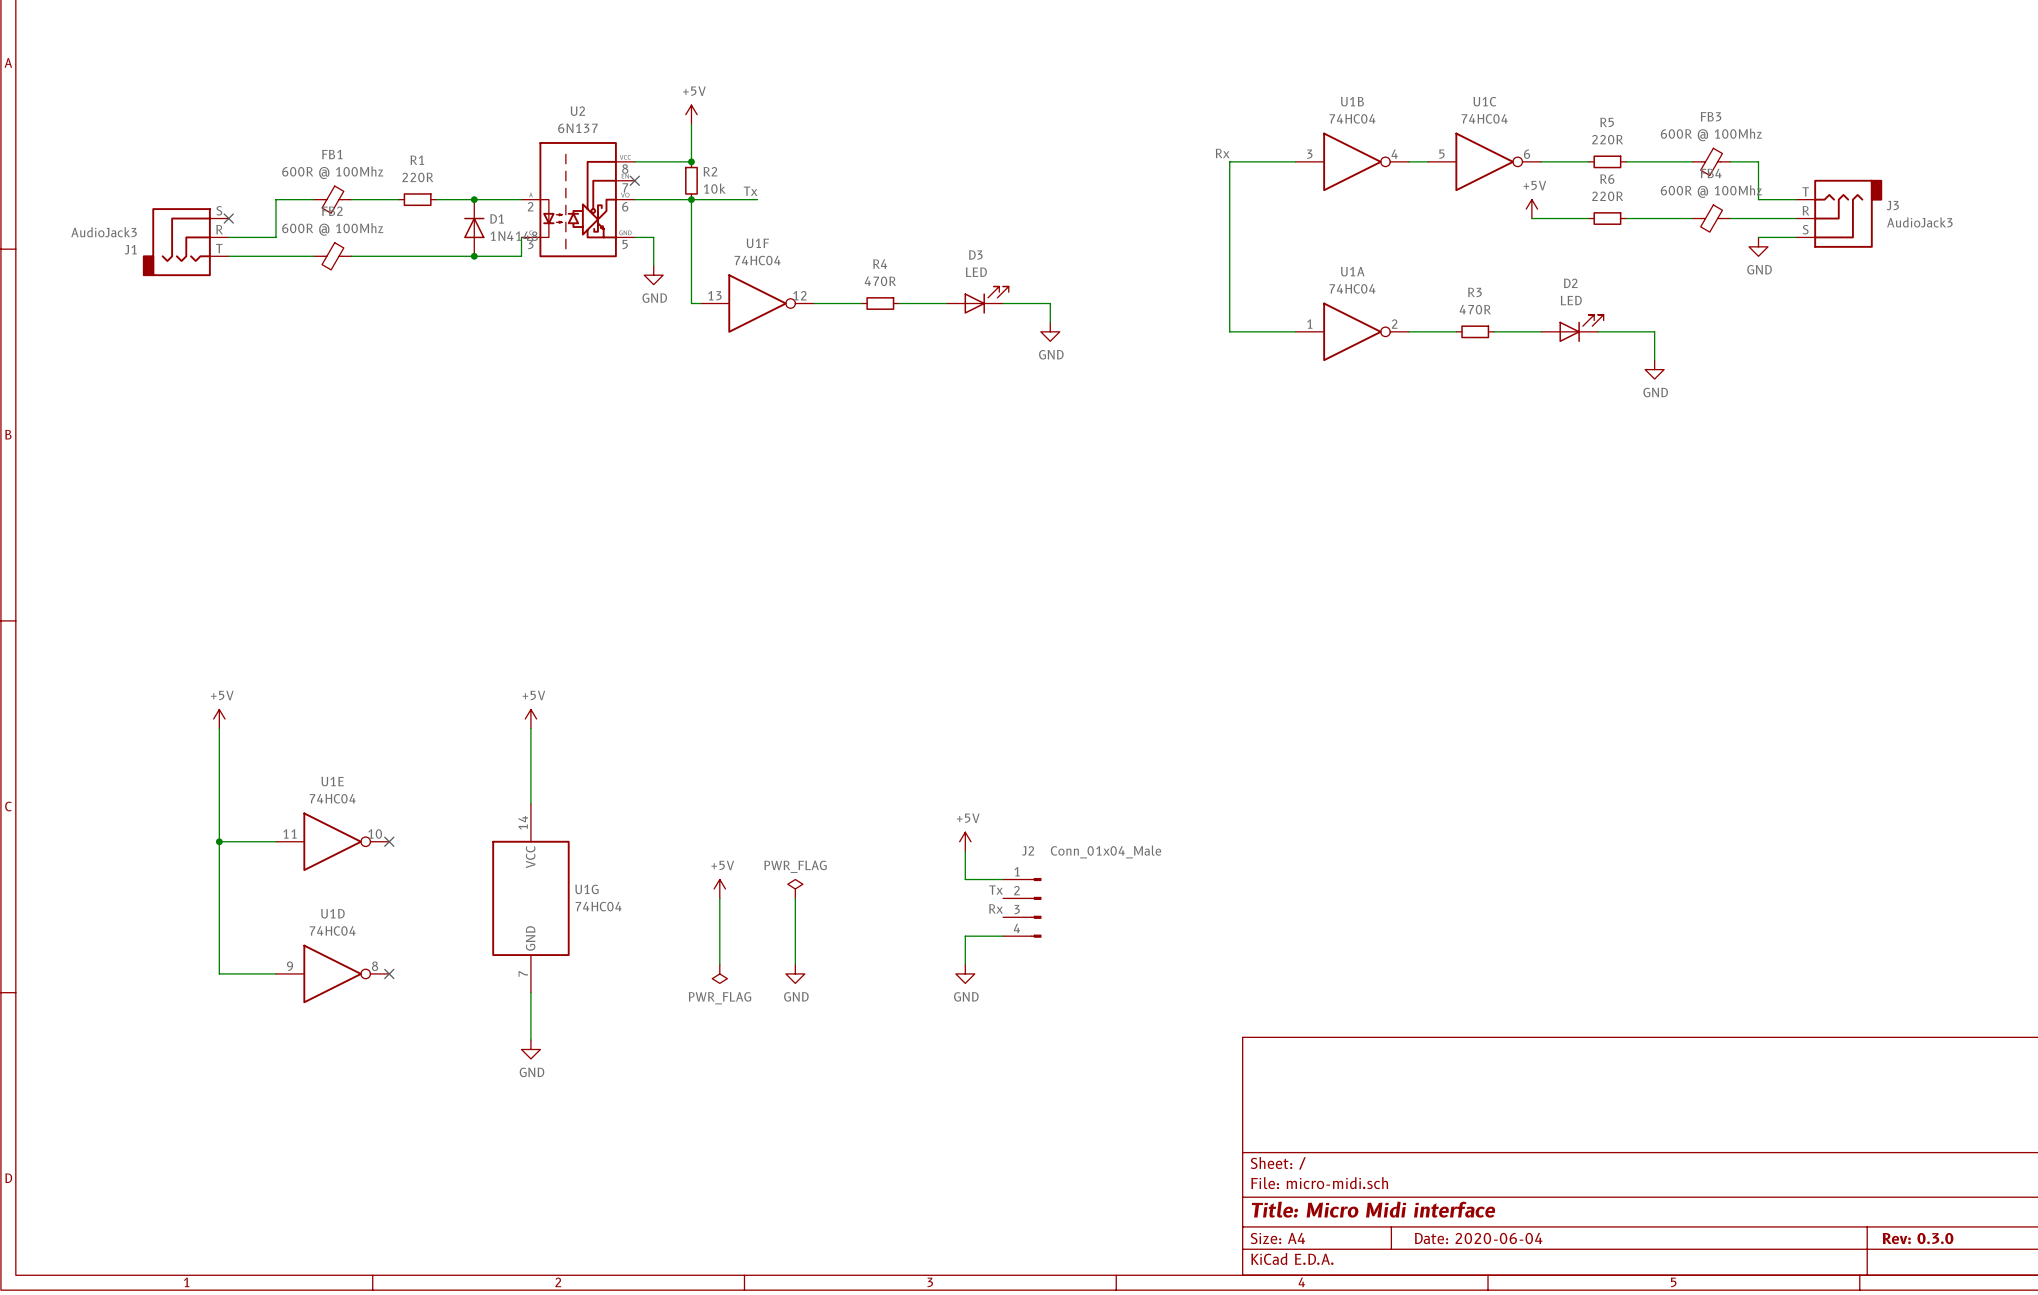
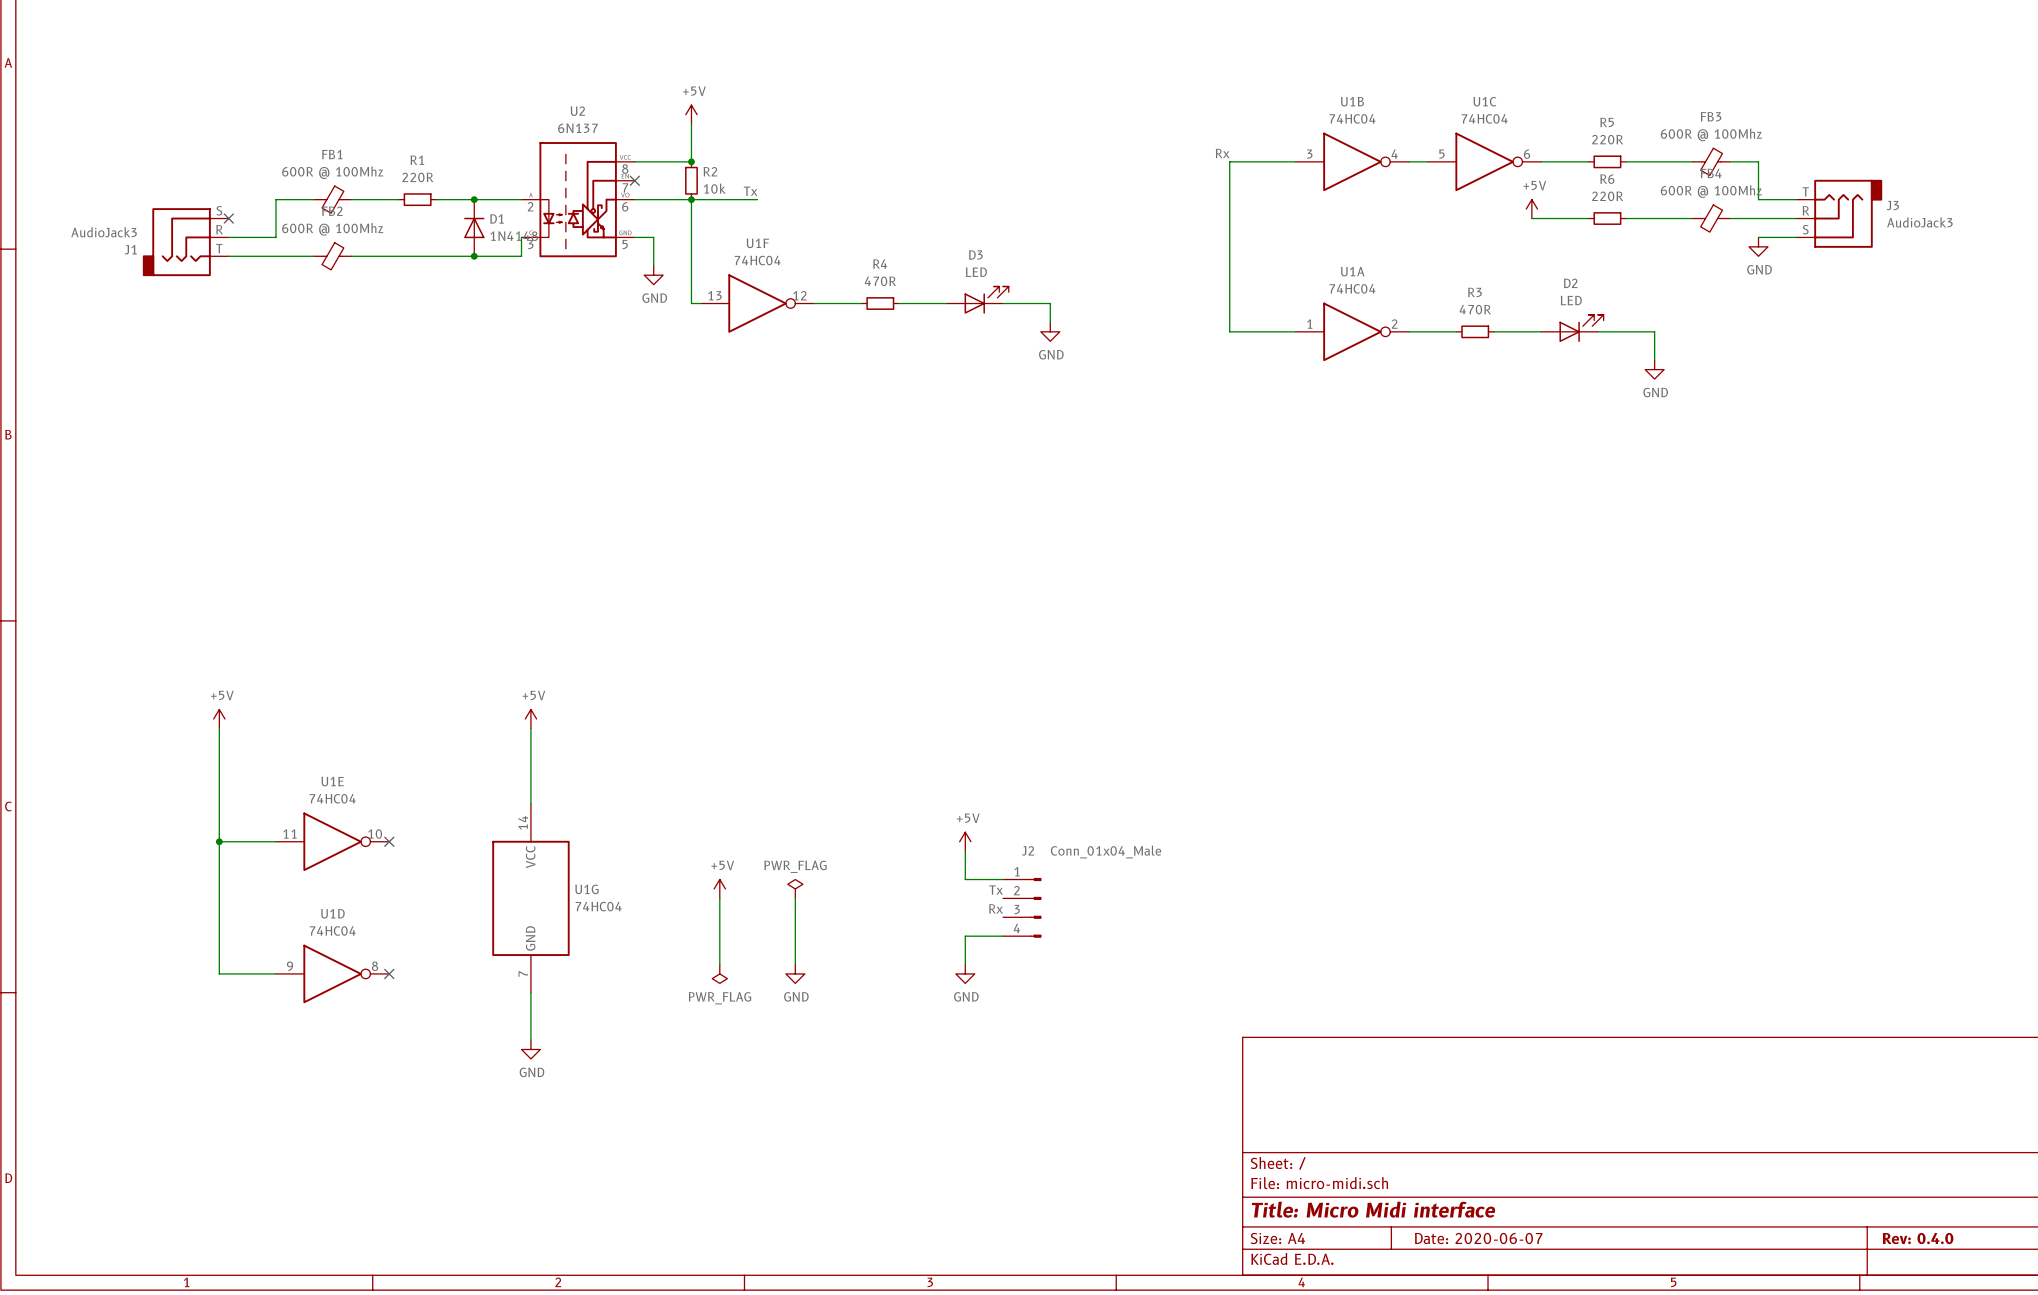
title block: Date: 2020-06-04 (1478, 1238) -> Date: 2020-06-07 (1478, 1238)
title block: Rev: 0.3.0 (1918, 1238) -> Rev: 0.4.0 (1918, 1238)

